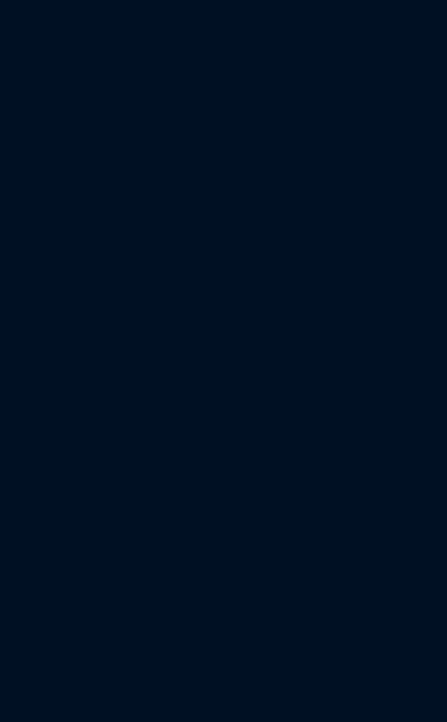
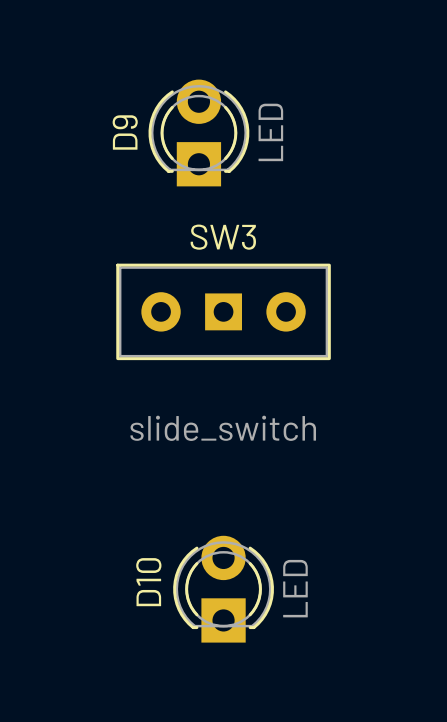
D9: none -> LED (198, 132)
SW3: none -> slide_switch (223, 311)
D10: none -> LED (223, 589)

